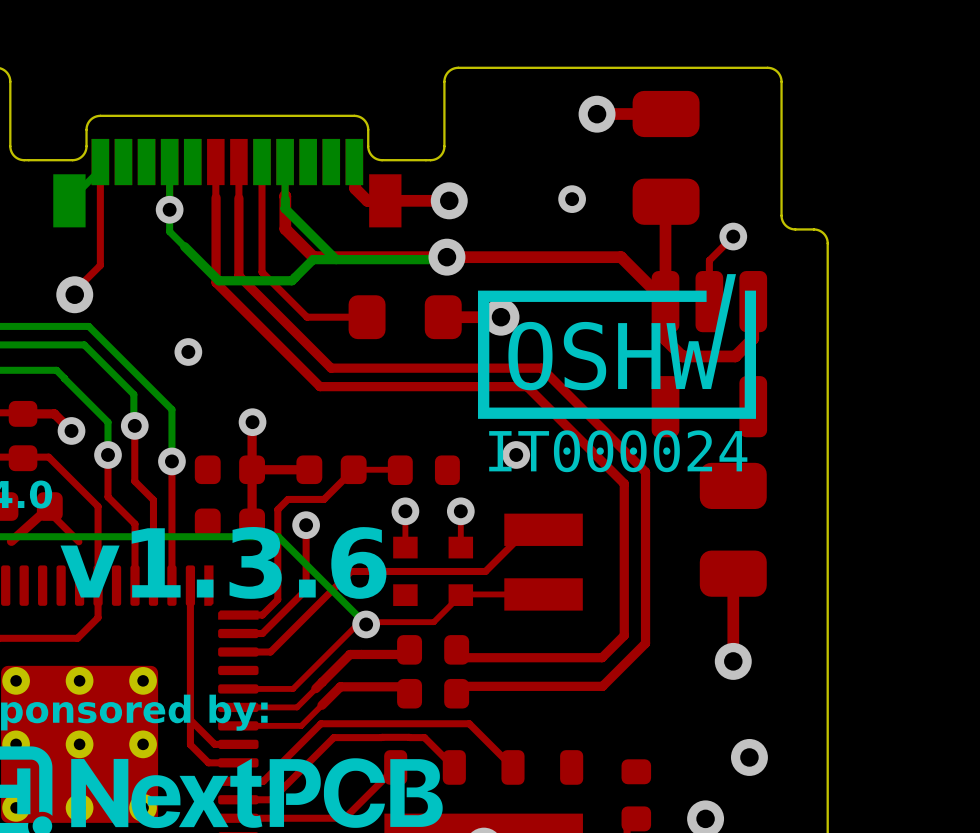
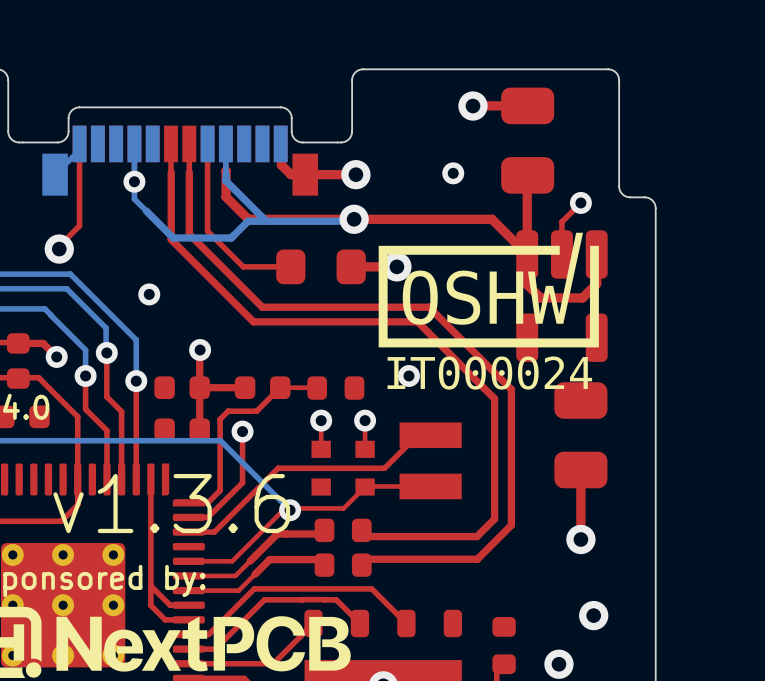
top track: (50, 506) (11, 541) -> none
top track: (49, 512) (78, 541) -> none
text position: v1.3.6 (223, 562) -> v1.3.6 (171, 503)

